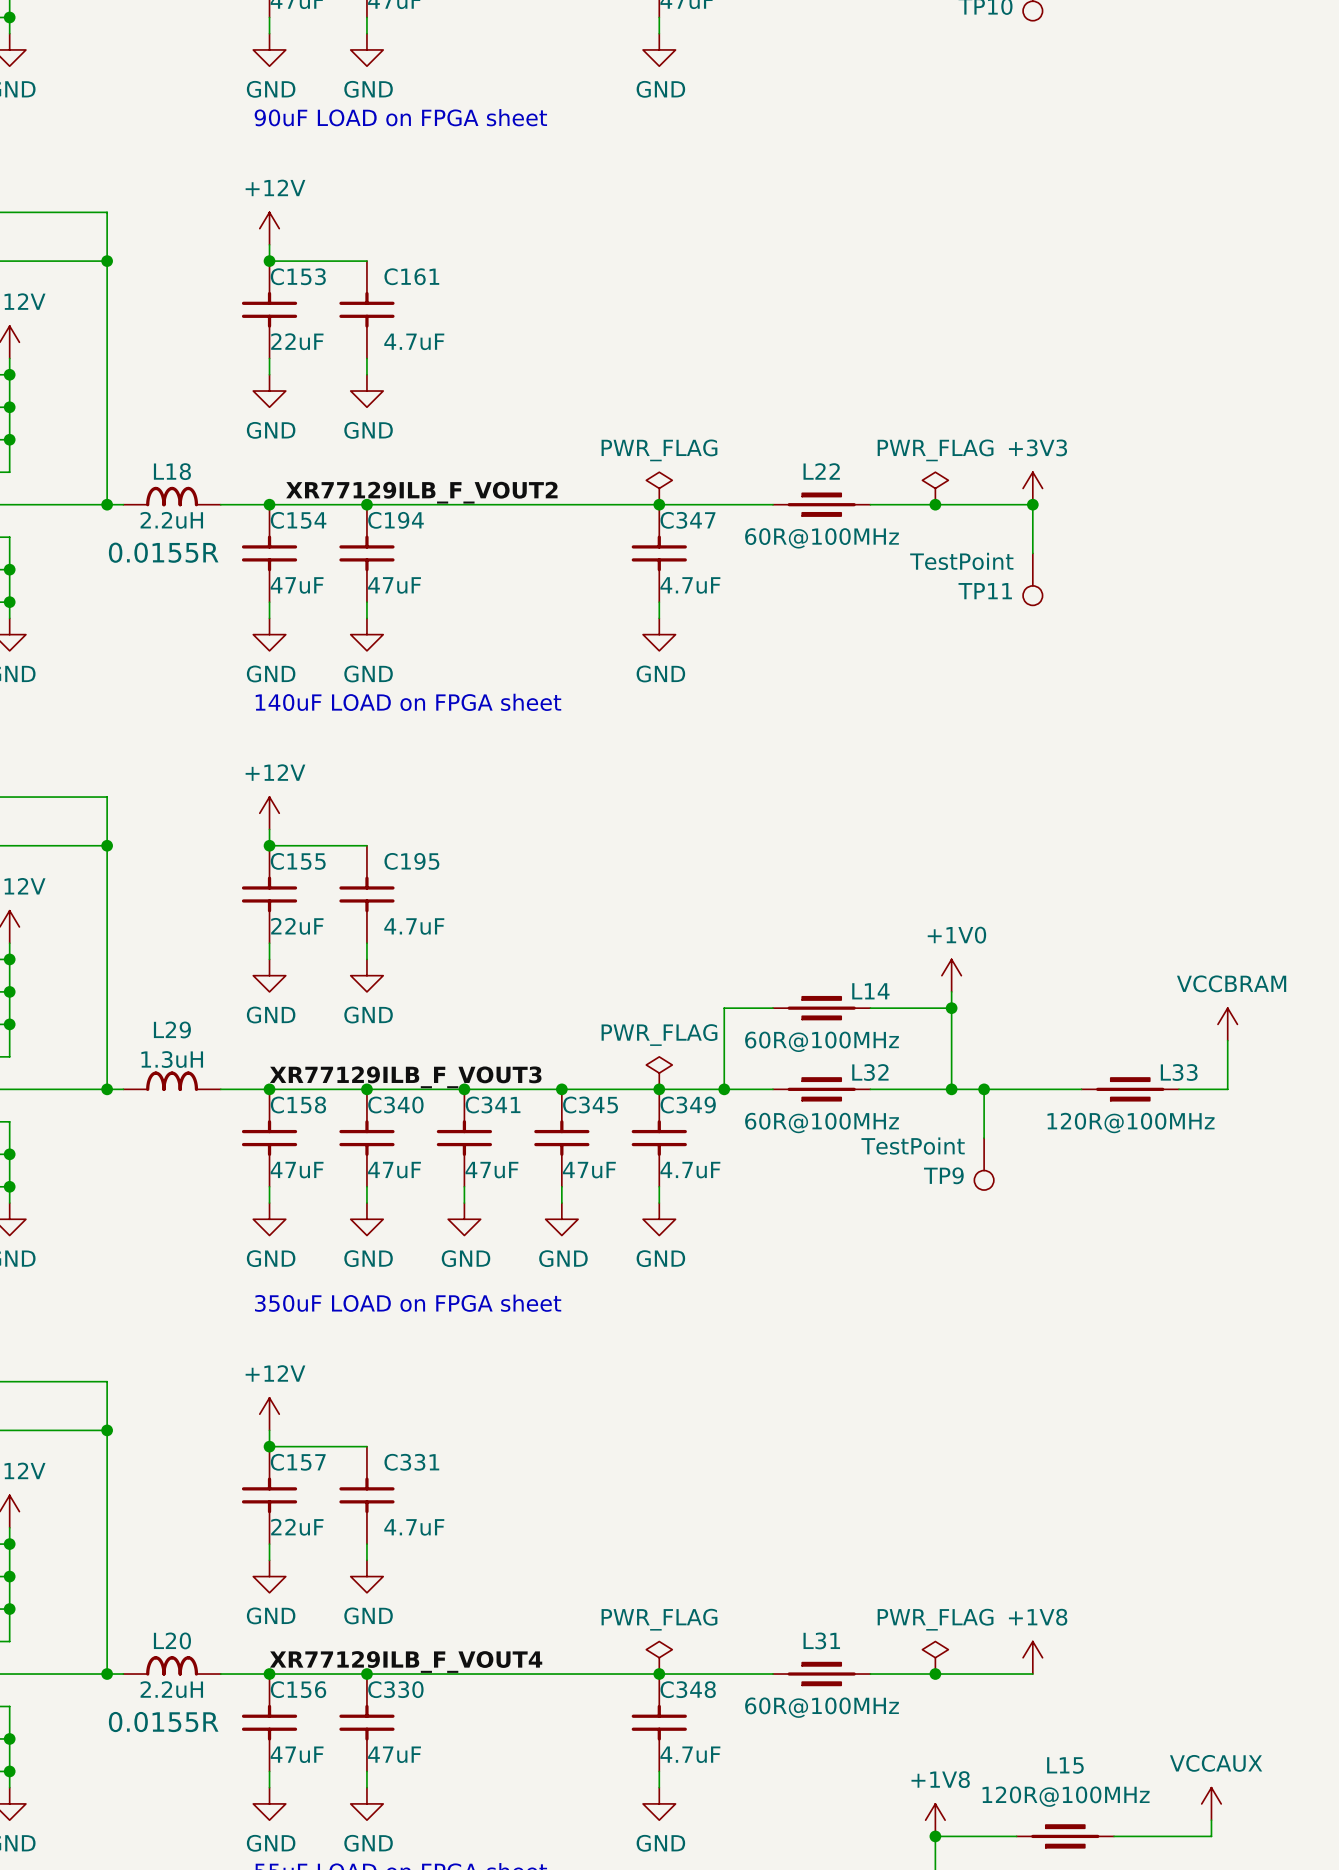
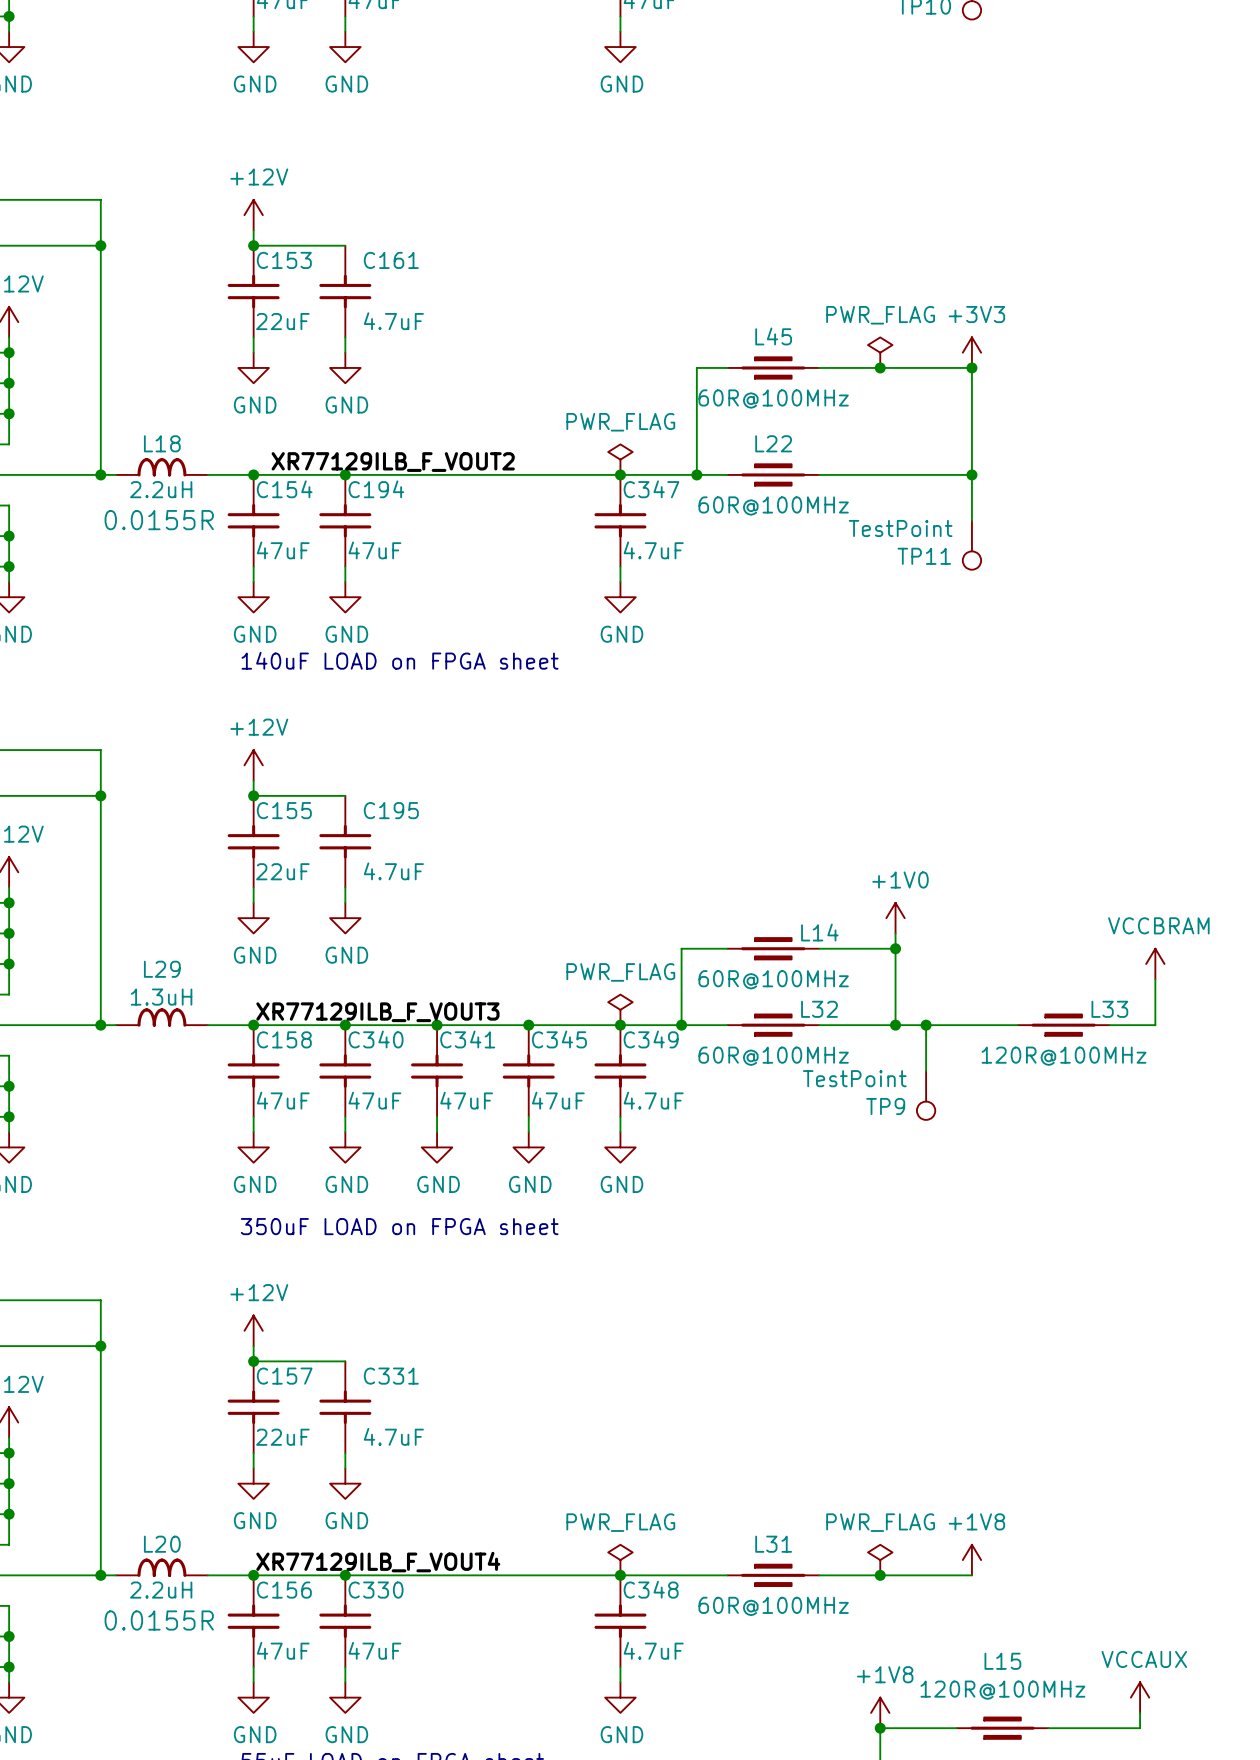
text: 90uF LOAD on FPGA sheet (400, 117) -> none
wire: none -> (727, 367) (696, 367) (696, 474)
L45: none -> (773, 367)
wire: none -> (819, 367) (971, 367) (971, 474)
junction: none -> (880, 367)
junction: none -> (971, 367)
power symbol position: PWR_FLAG (935, 488) -> PWR_FLAG (880, 352)
power symbol position: +3V3 (1032, 488) -> +3V3 (971, 352)
junction: none -> (696, 474)
junction: (935, 504) -> none

